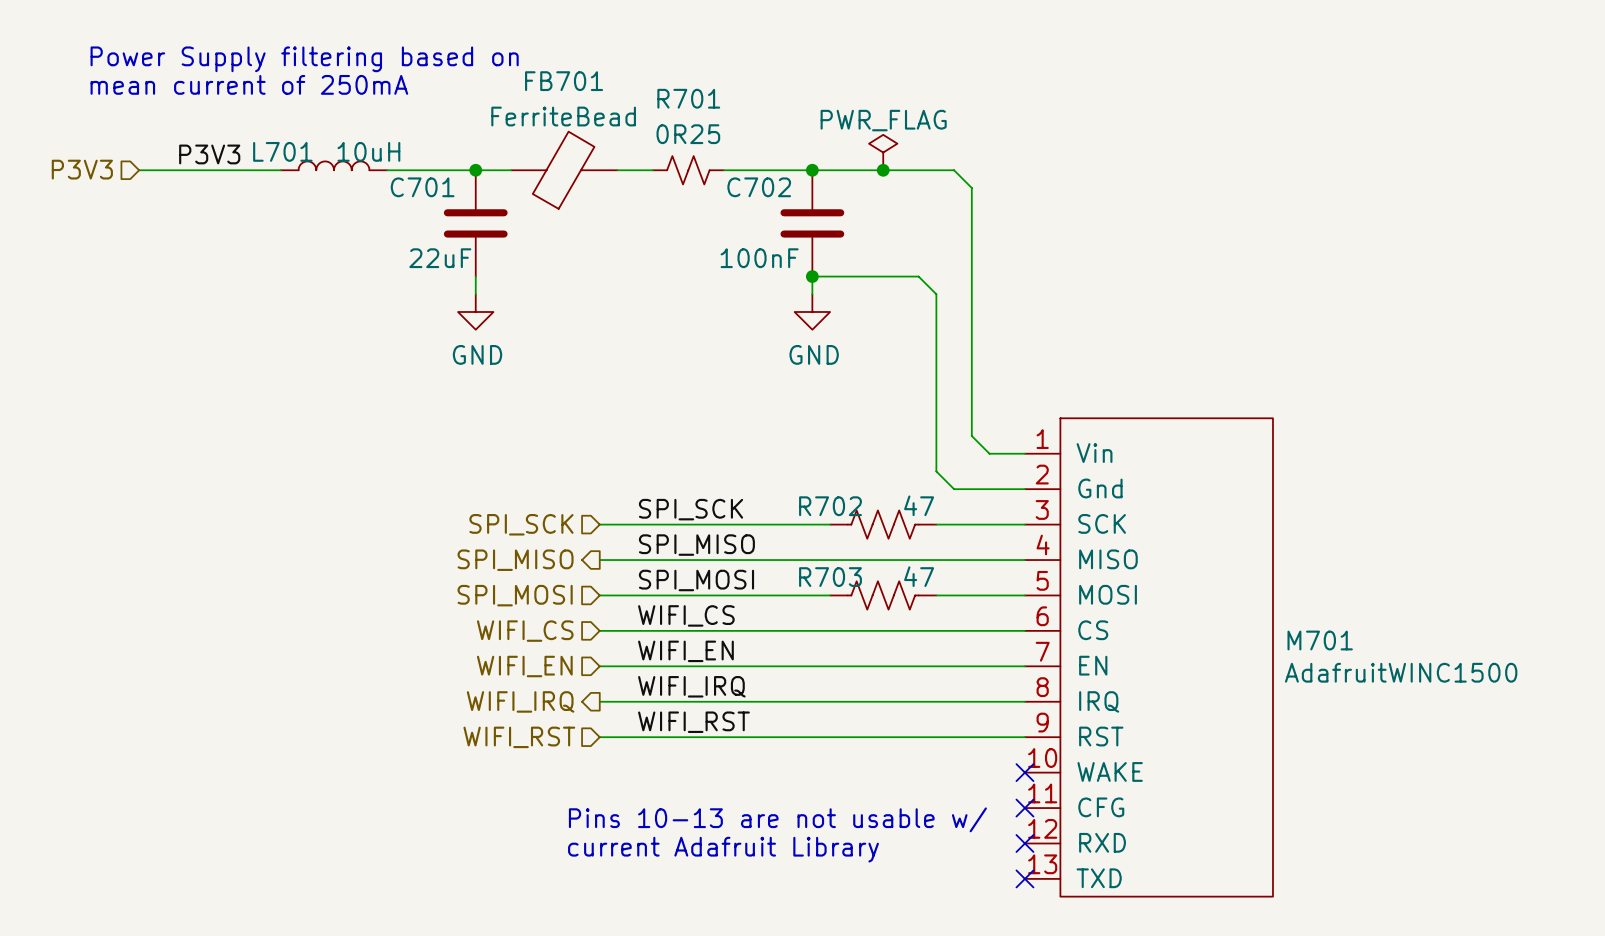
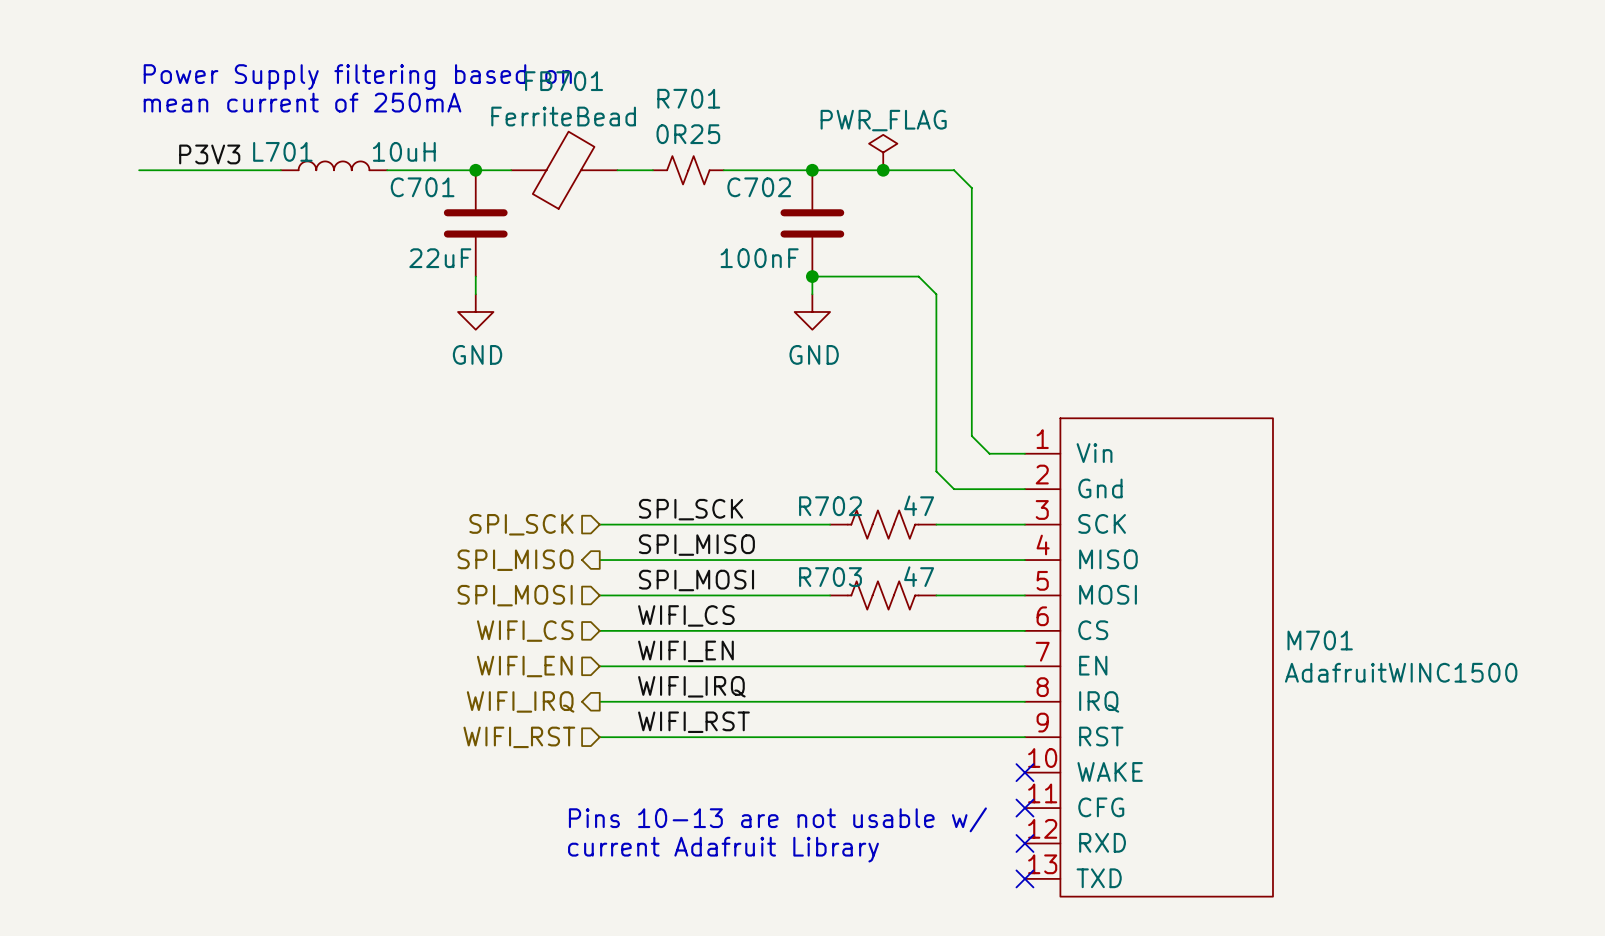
text position: Power Supply filtering based on (304, 59) -> Power Supply filtering based on (357, 77)
text position: mean current of 250mA (249, 84) -> mean current of 250mA (302, 102)
L701 value position: 10uH (368, 151) -> 10uH (404, 151)
hierarchical label: P3V3 (82, 169) -> none

